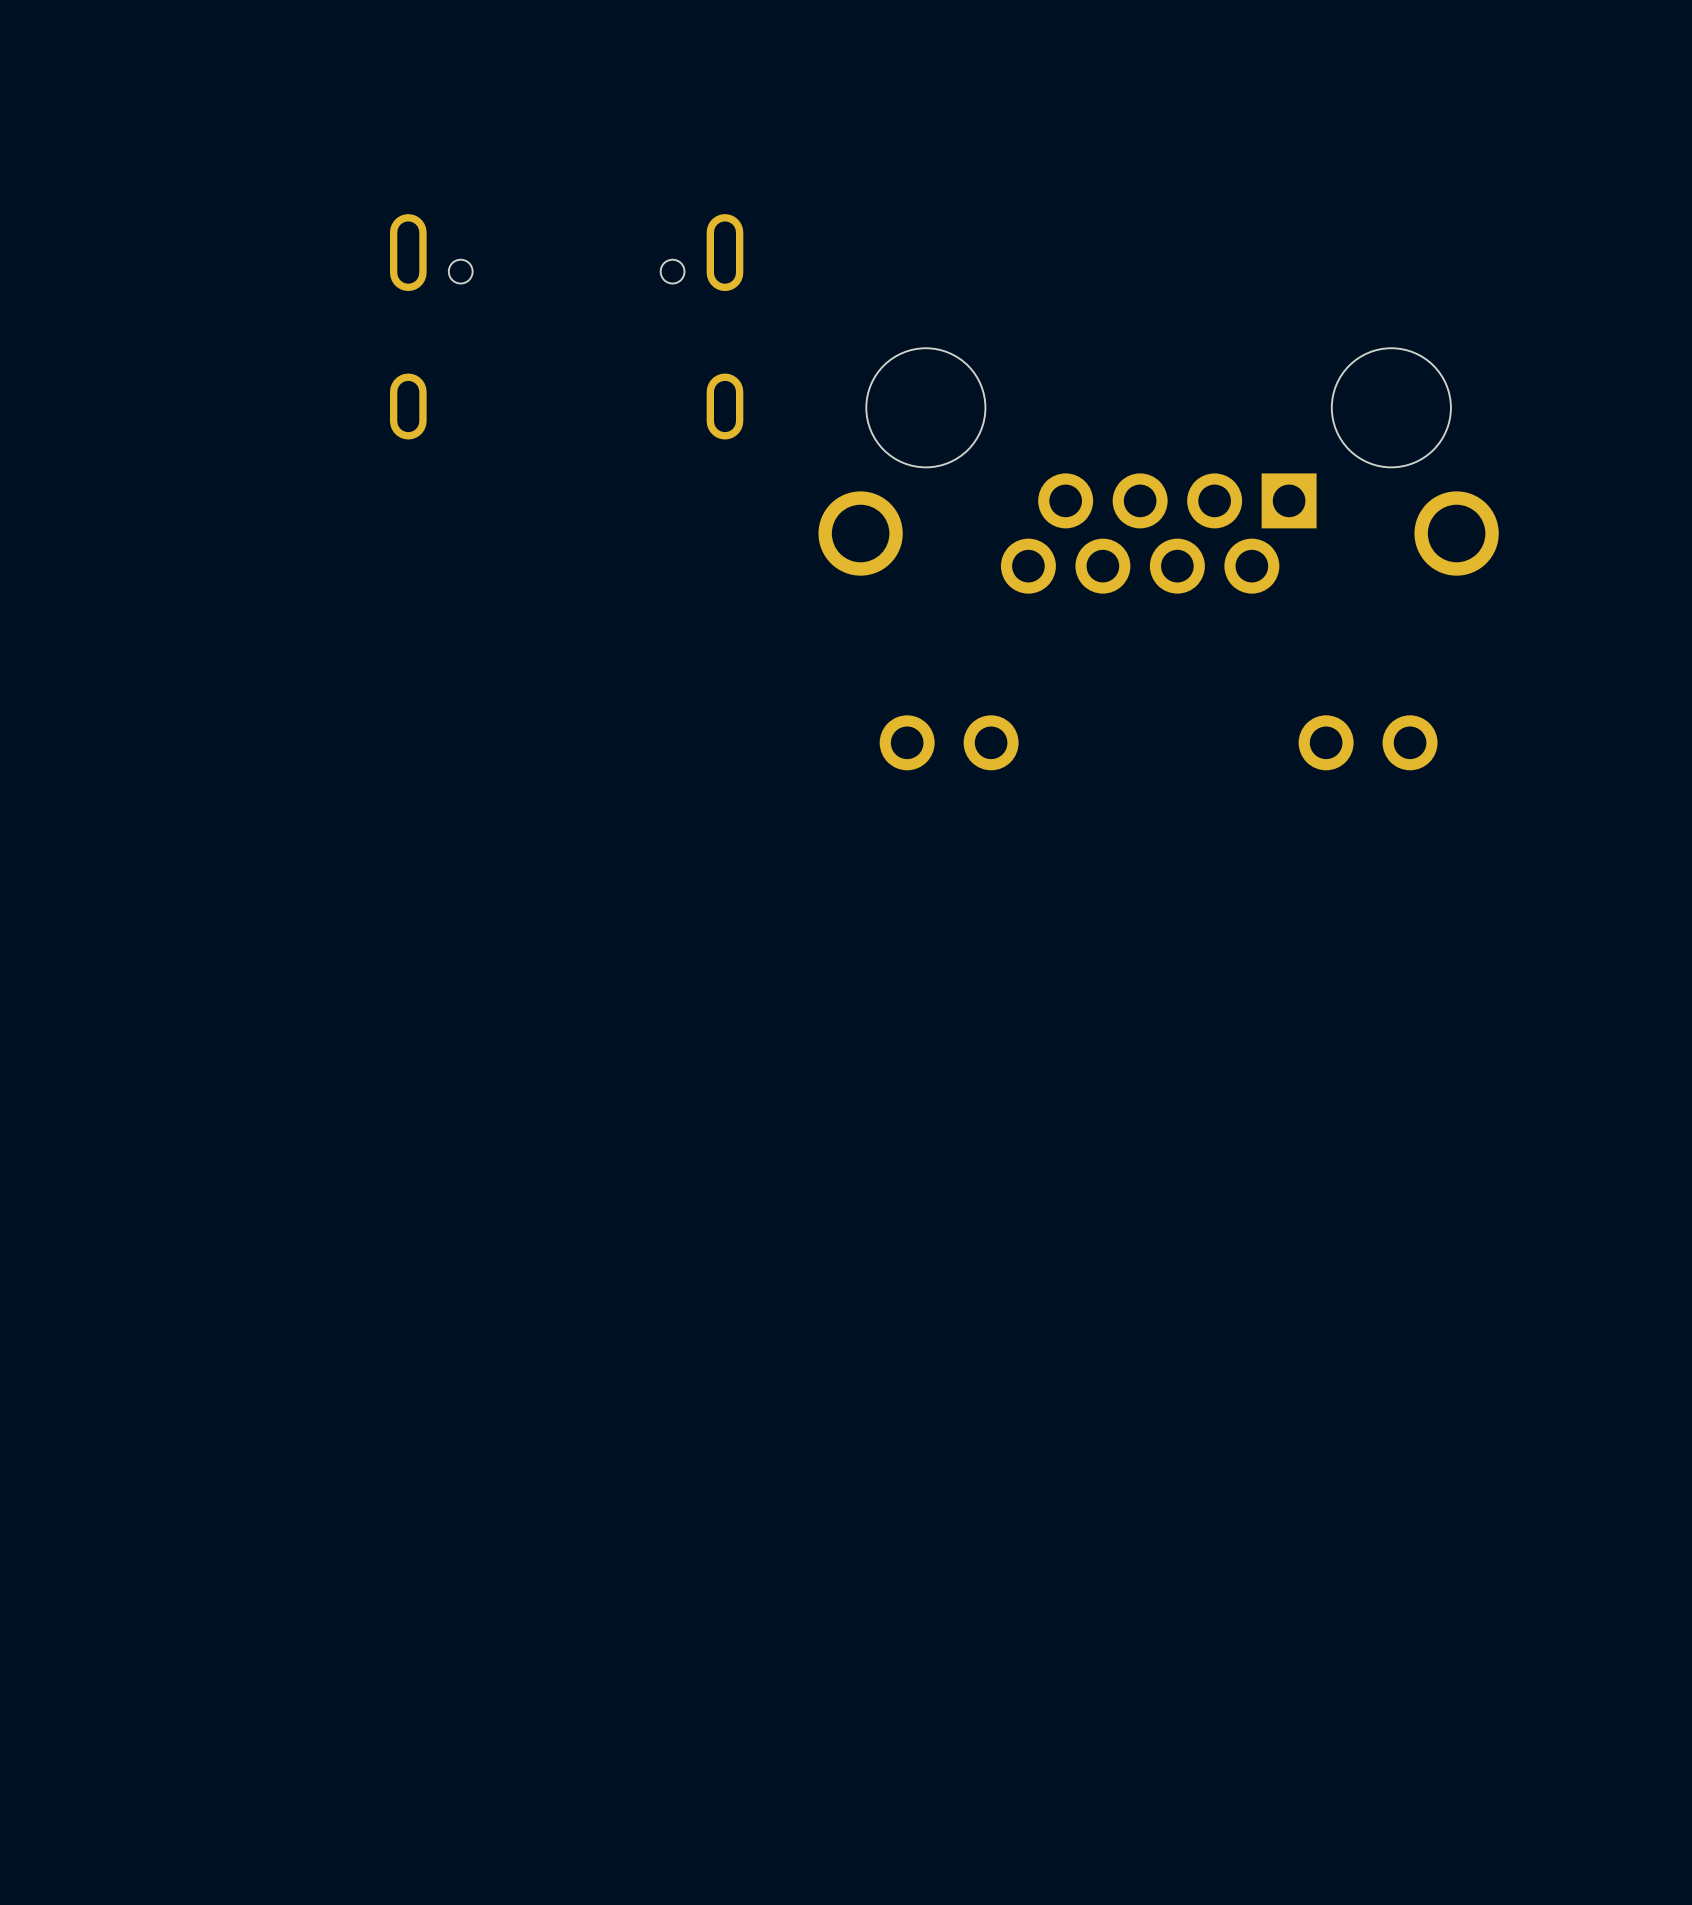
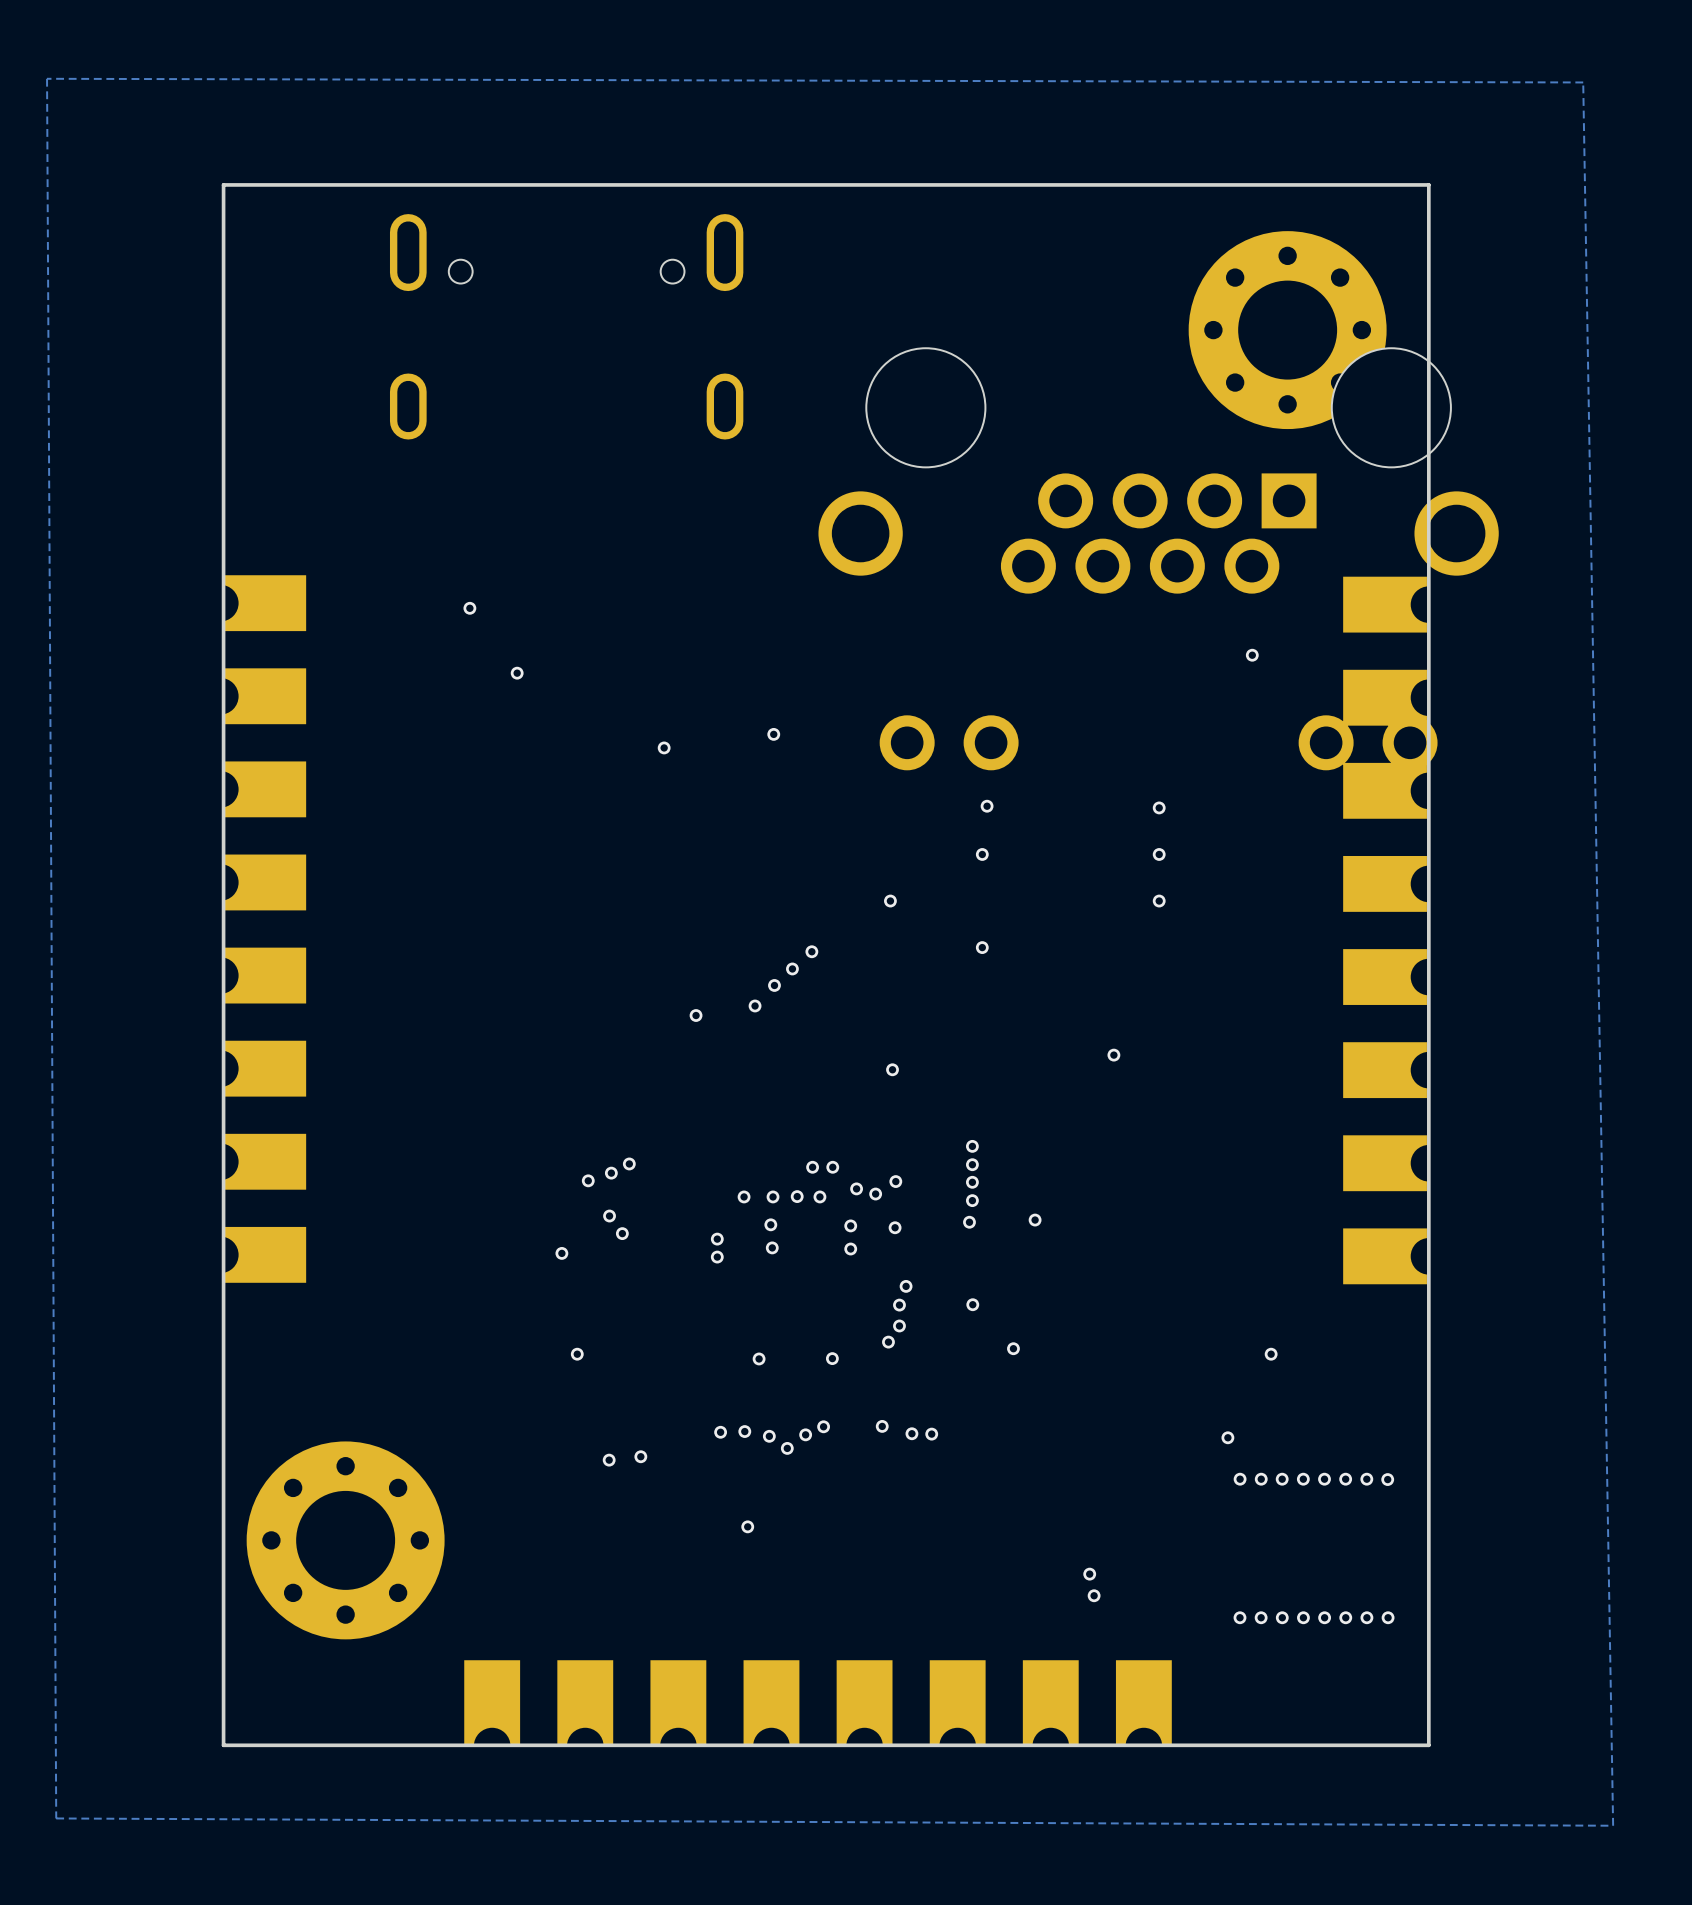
zone outline: none -> (47, 78) (1583, 82) (1613, 1825) (56, 1818) (47, 78)
board edge: none -> (1428, 184) (223, 184) (223, 1745) (1428, 1745) (1428, 184)
part: none -> (1287, 330)
via: none -> (469, 608)
via: none -> (1252, 655)
via: none -> (517, 673)
via: none -> (773, 734)
via: none -> (664, 747)
via: none -> (987, 806)
via: none -> (1159, 807)
via: none -> (982, 854)
via: none -> (1159, 854)
via: none -> (890, 901)
via: none -> (1159, 901)
part: none -> (254, 929)
part: none -> (1395, 930)
via: none -> (982, 947)
via: none -> (811, 951)
via: none -> (792, 968)
via: none -> (774, 985)
via: none -> (755, 1005)
via: none -> (696, 1015)
via: none -> (1113, 1055)
via: none -> (892, 1069)
via: none -> (972, 1146)
via: none -> (629, 1163)
via: none -> (972, 1164)
via: none -> (812, 1167)
via: none -> (832, 1167)
via: none -> (611, 1173)
via: none -> (588, 1180)
via: none -> (895, 1181)
via: none -> (972, 1182)
via: none -> (856, 1188)
via: none -> (875, 1194)
via: none -> (744, 1196)
via: none -> (773, 1196)
via: none -> (797, 1196)
via: none -> (819, 1196)
via: none -> (972, 1200)
via: none -> (609, 1216)
via: none -> (1035, 1220)
via: none -> (969, 1222)
via: none -> (770, 1224)
via: none -> (850, 1225)
via: none -> (895, 1227)
via: none -> (622, 1233)
via: none -> (717, 1239)
via: none -> (772, 1247)
via: none -> (850, 1249)
via: none -> (561, 1253)
via: none -> (717, 1257)
via: none -> (906, 1286)
via: none -> (972, 1304)
via: none -> (899, 1305)
via: none -> (899, 1325)
via: none -> (888, 1342)
via: none -> (1013, 1348)
via: none -> (577, 1354)
via: none -> (1271, 1354)
via: none -> (759, 1358)
via: none -> (832, 1358)
via: none -> (823, 1426)
via: none -> (882, 1426)
via: none -> (744, 1431)
via: none -> (720, 1432)
via: none -> (911, 1433)
via: none -> (805, 1434)
via: none -> (931, 1434)
via: none -> (769, 1436)
via: none -> (1227, 1437)
via: none -> (787, 1448)
via: none -> (640, 1456)
via: none -> (609, 1460)
via: none -> (1240, 1479)
via: none -> (1261, 1479)
via: none -> (1282, 1479)
via: none -> (1303, 1479)
via: none -> (1324, 1479)
via: none -> (1345, 1479)
via: none -> (1366, 1479)
via: none -> (1387, 1479)
via: none -> (747, 1526)
part: none -> (345, 1540)
via: none -> (1089, 1574)
via: none -> (1094, 1595)
via: none -> (1239, 1617)
via: none -> (1261, 1617)
via: none -> (1282, 1617)
via: none -> (1303, 1617)
via: none -> (1324, 1617)
via: none -> (1345, 1617)
via: none -> (1366, 1617)
via: none -> (1388, 1617)
part: none -> (818, 1712)

